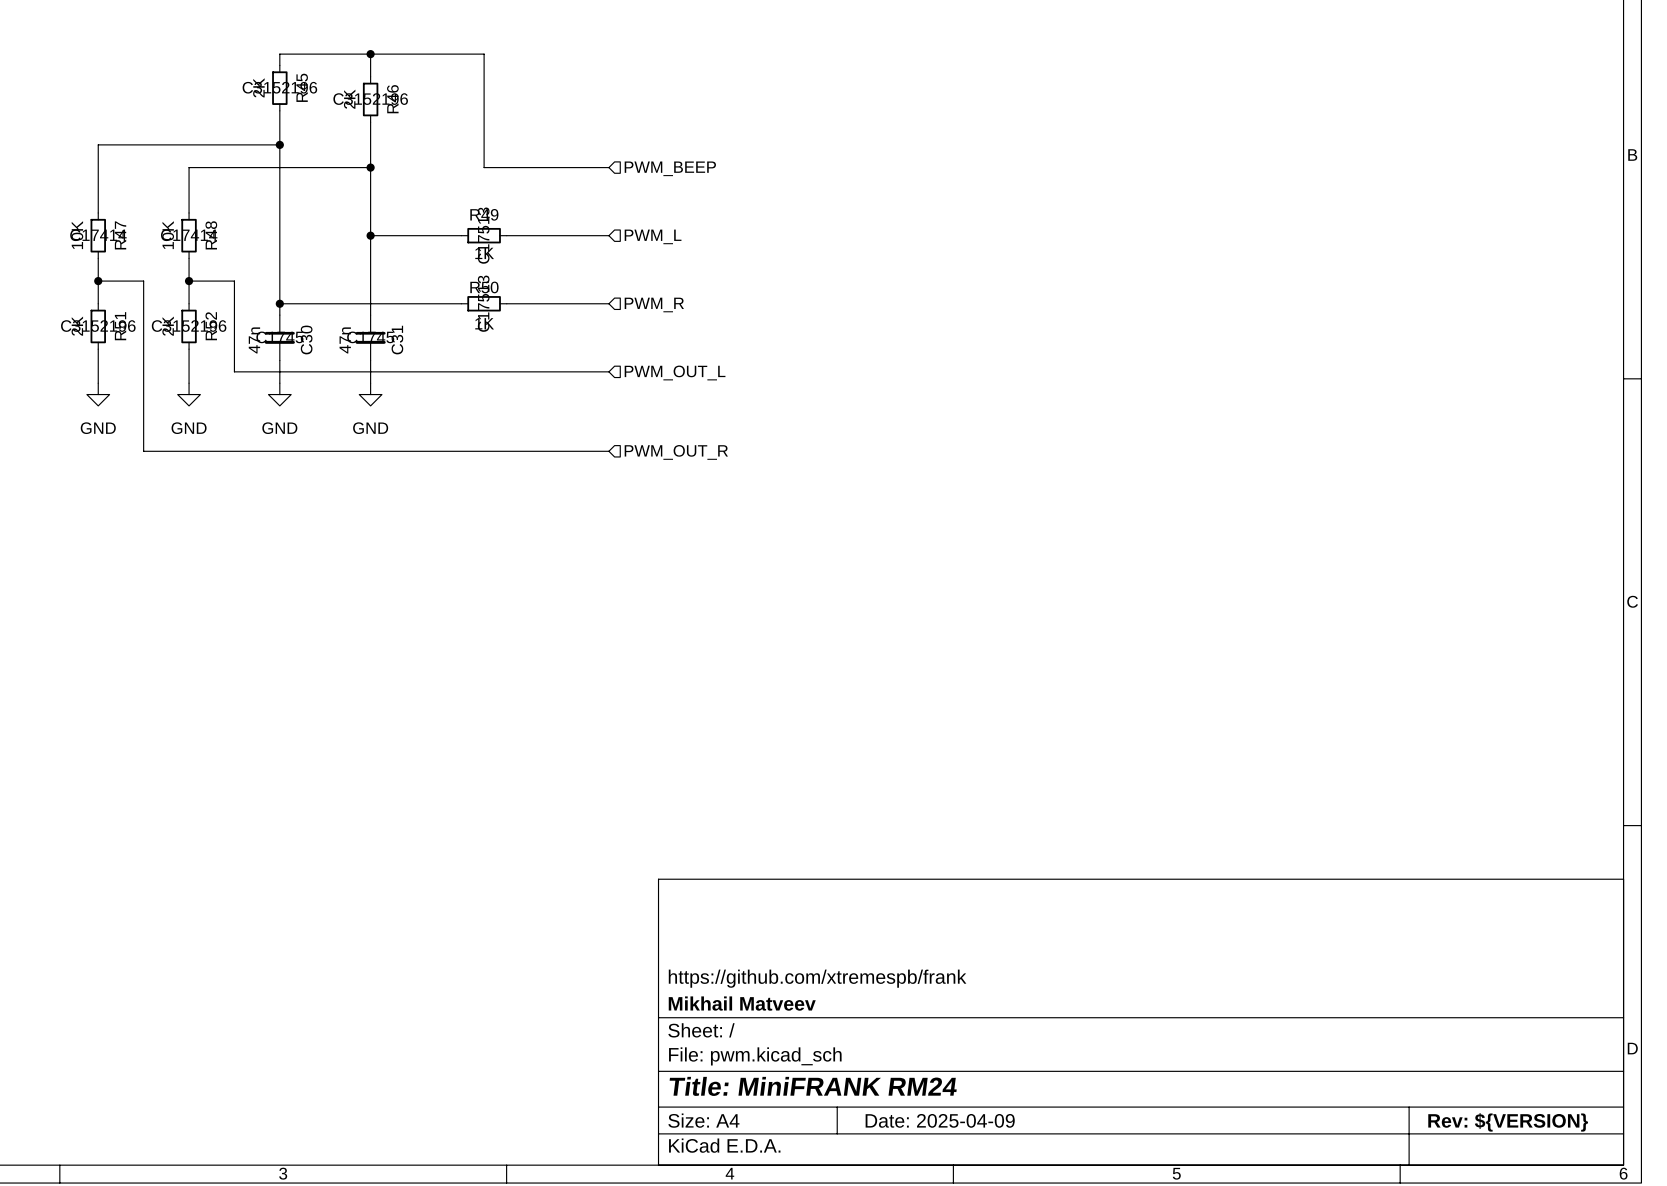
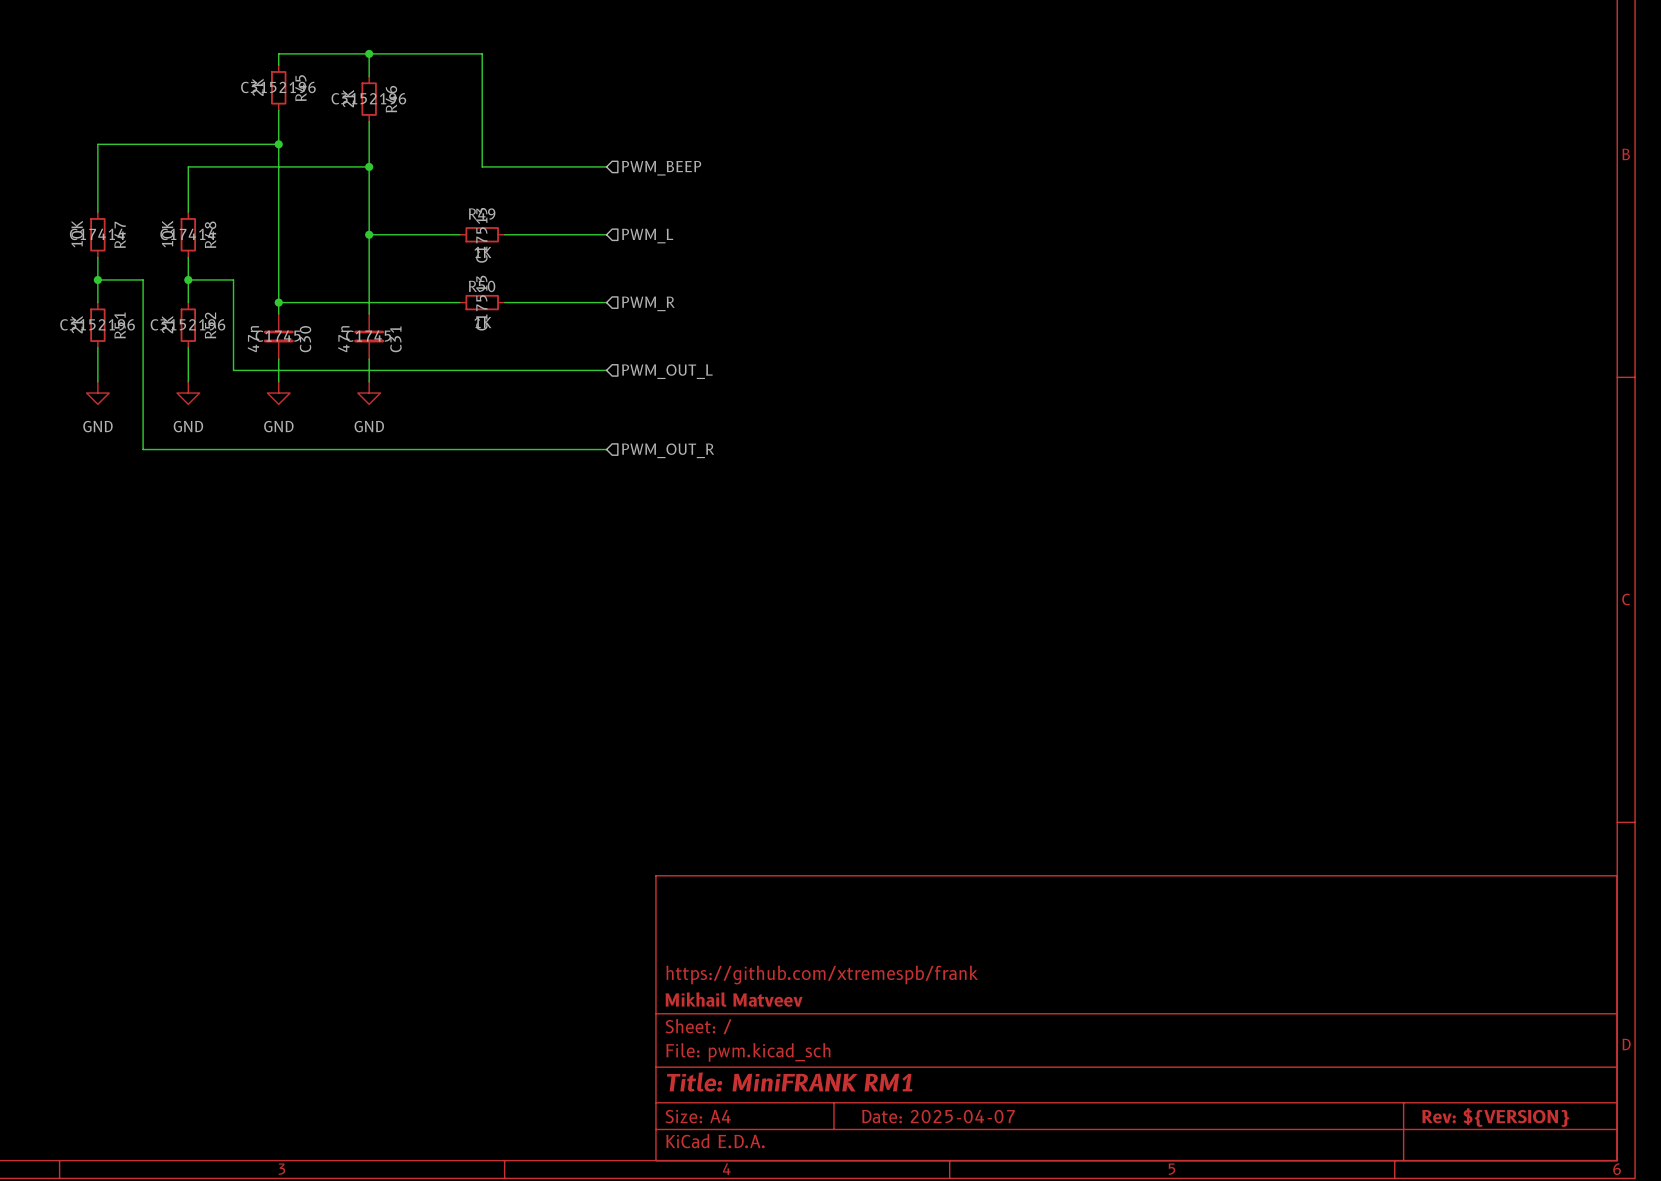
title block: Title: MiniFRANK RM24 (813, 1086) -> Title: MiniFRANK RM1 (789, 1082)
title block: Date: 2025-04-09 (940, 1120) -> Date: 2025-04-07 (938, 1116)

